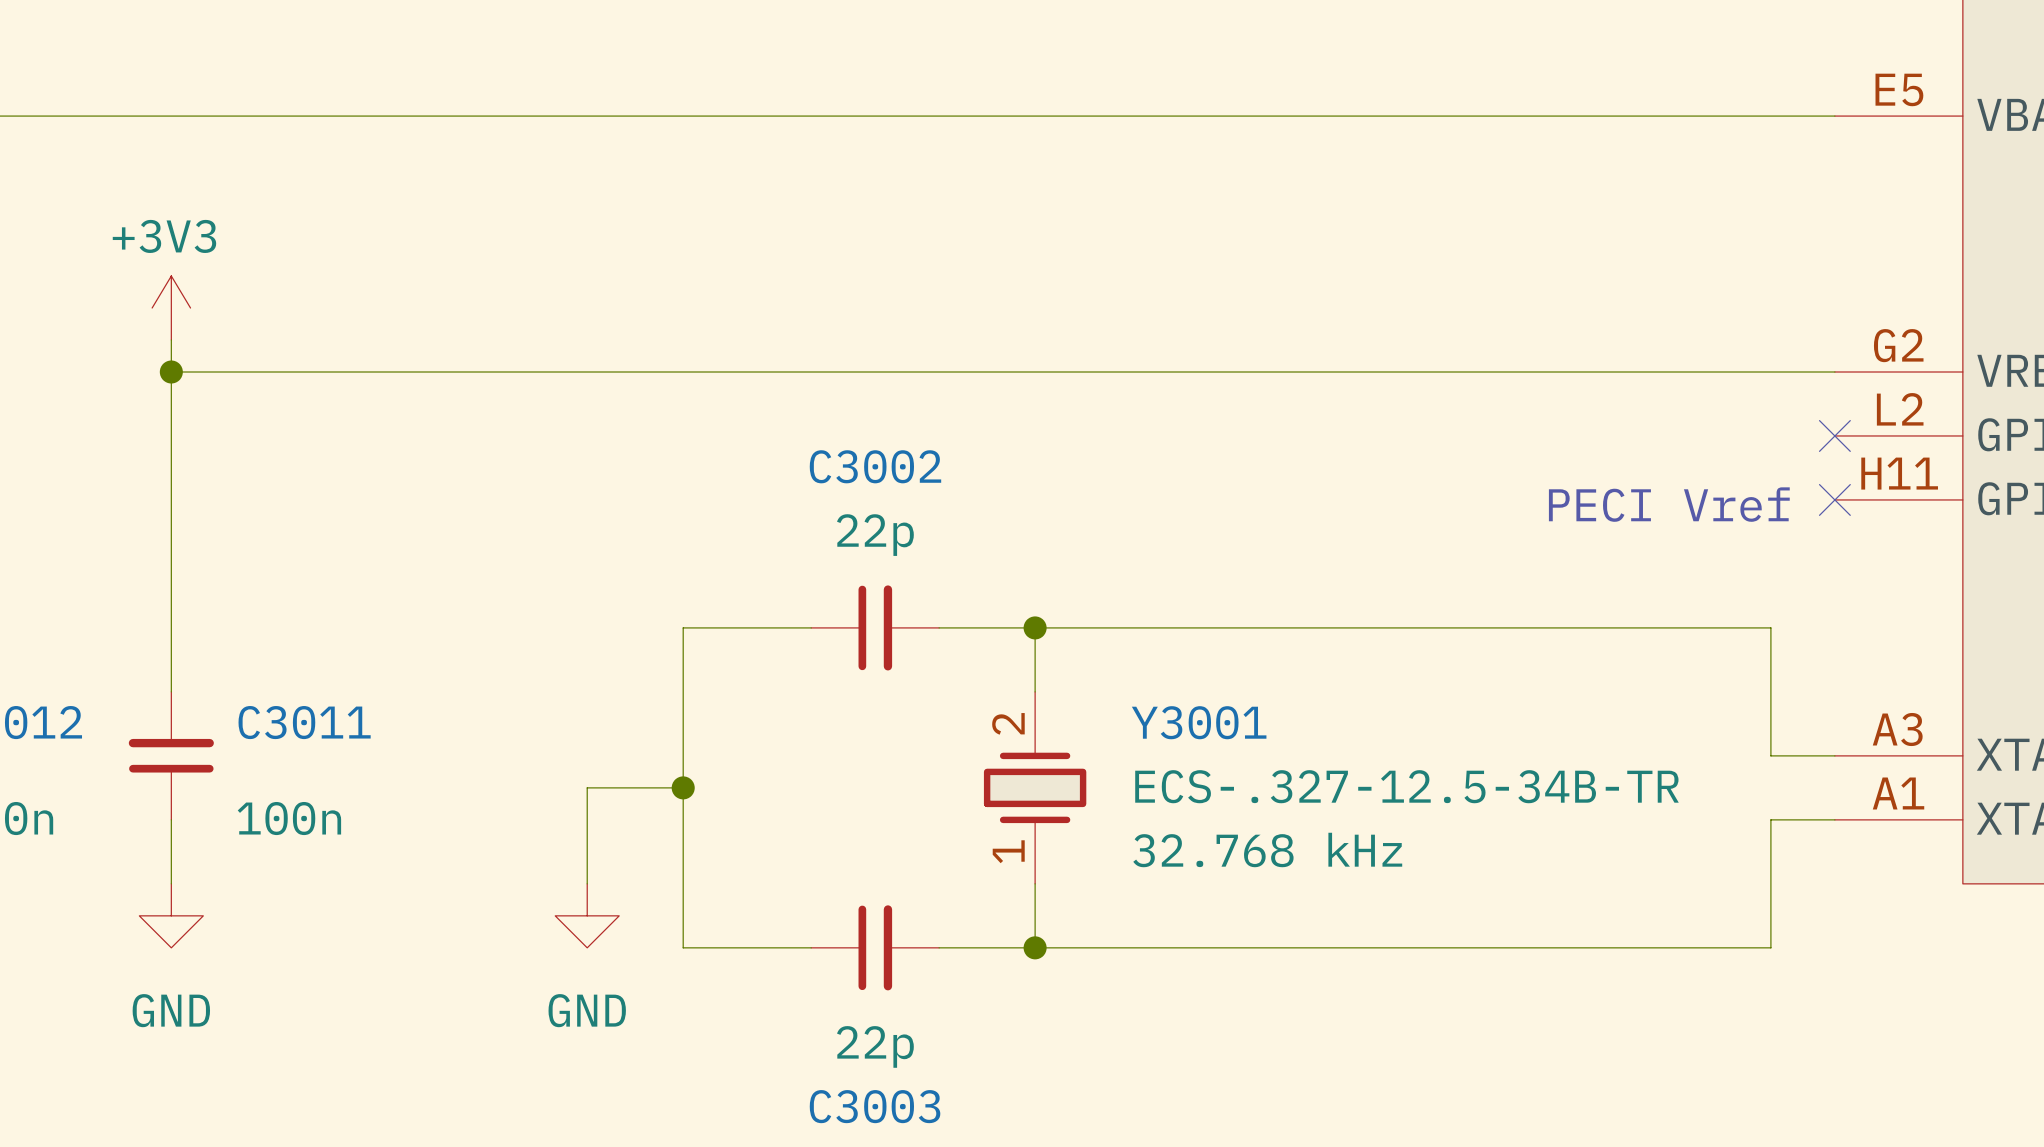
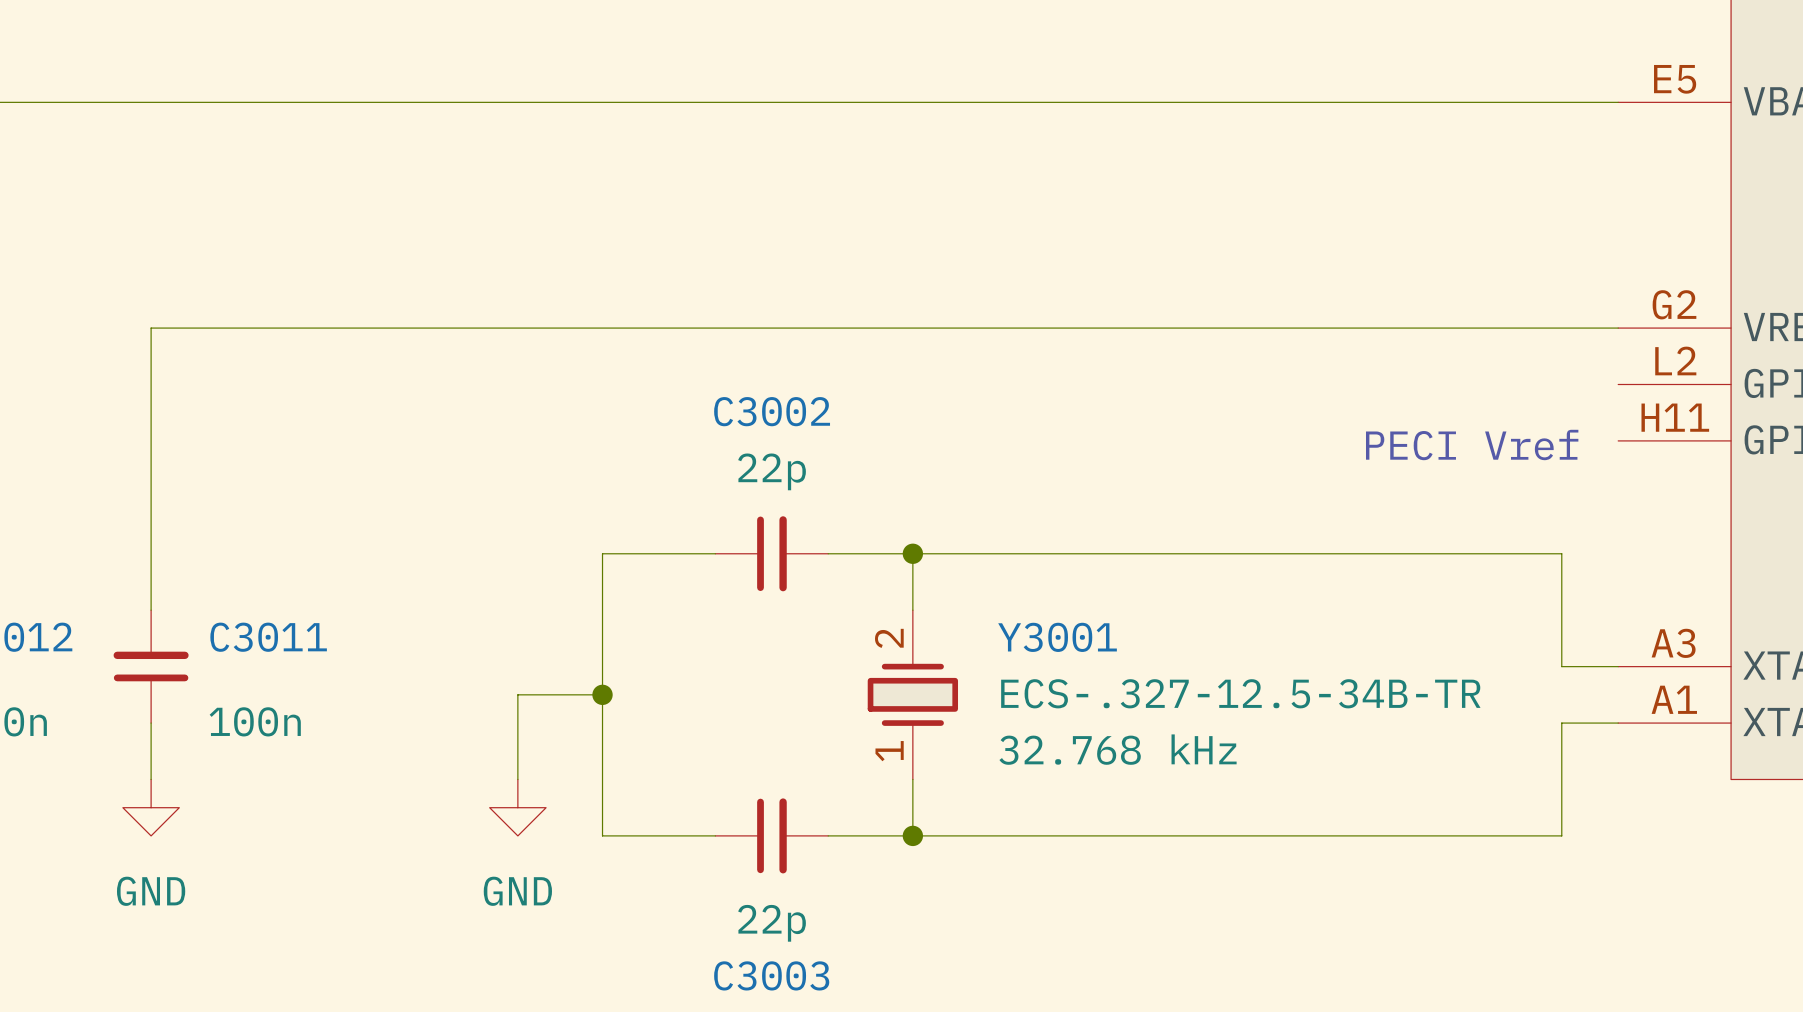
power symbol: +3V3 (171, 308) -> none
wire: (171, 340) (171, 372) -> none
junction: (171, 372) -> none
no-connect mark: (1834, 435) -> none
no-connect mark: (1834, 499) -> none

